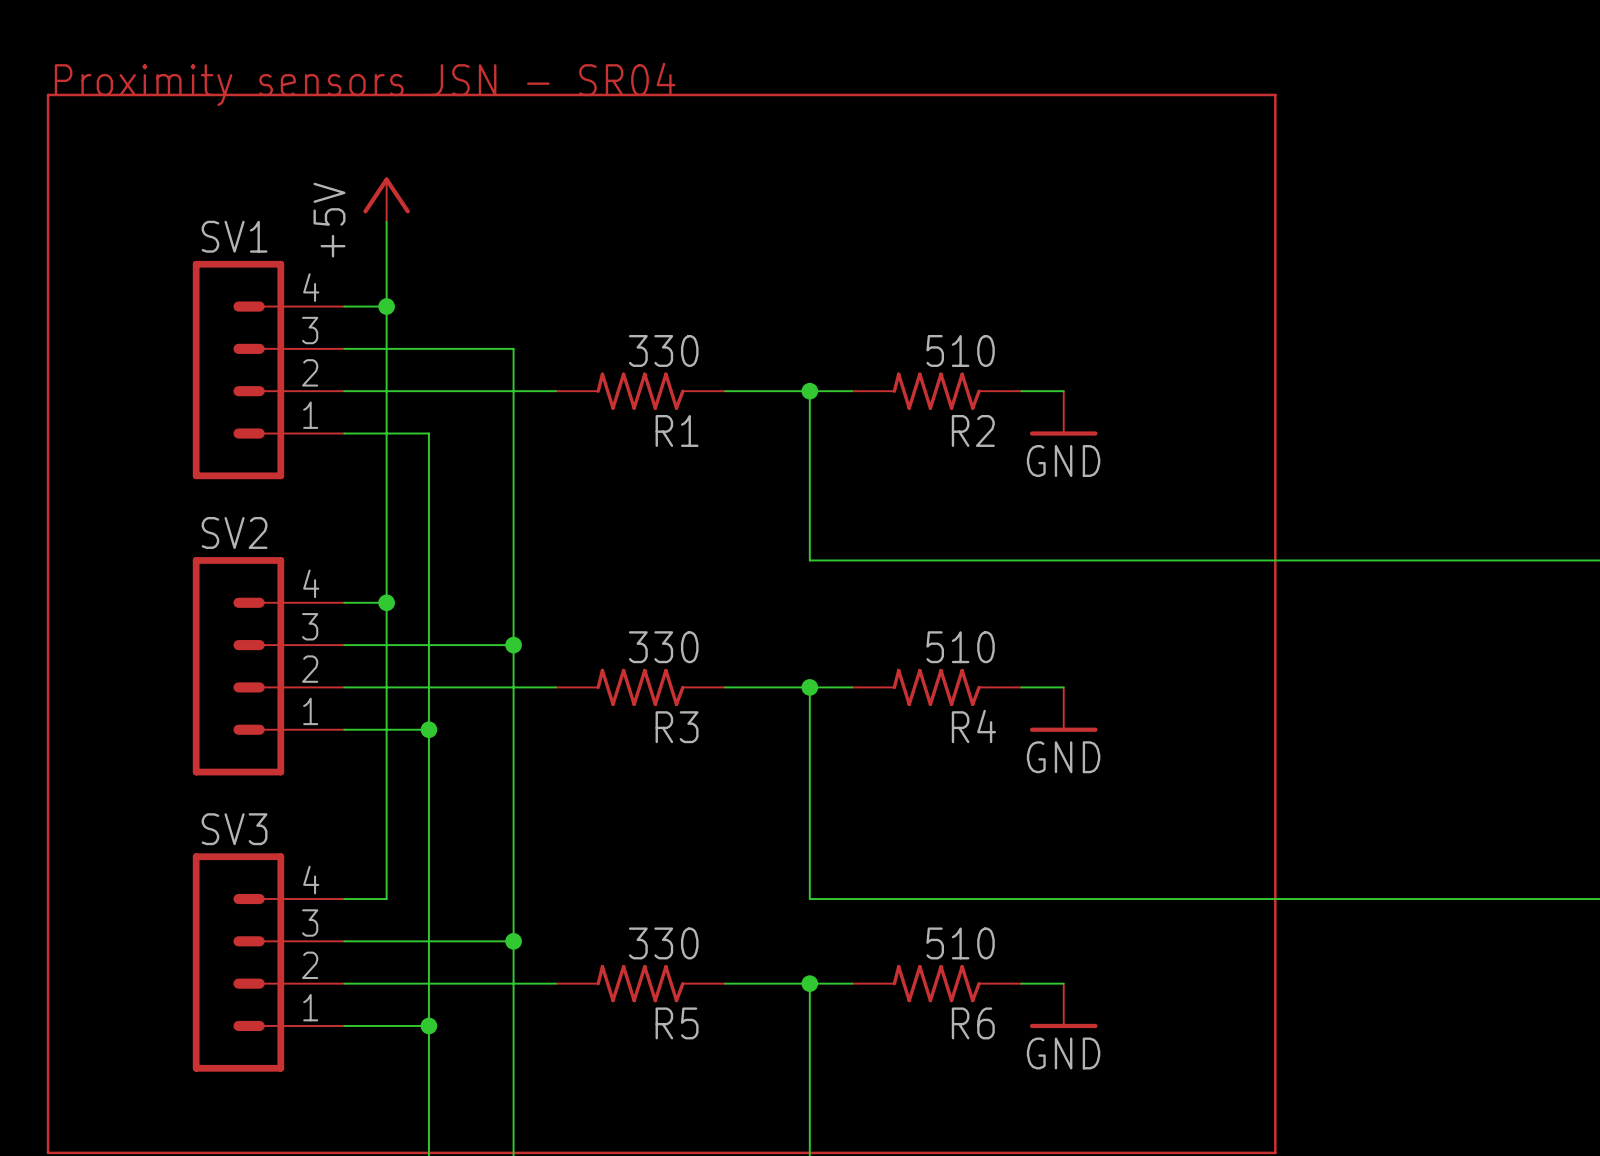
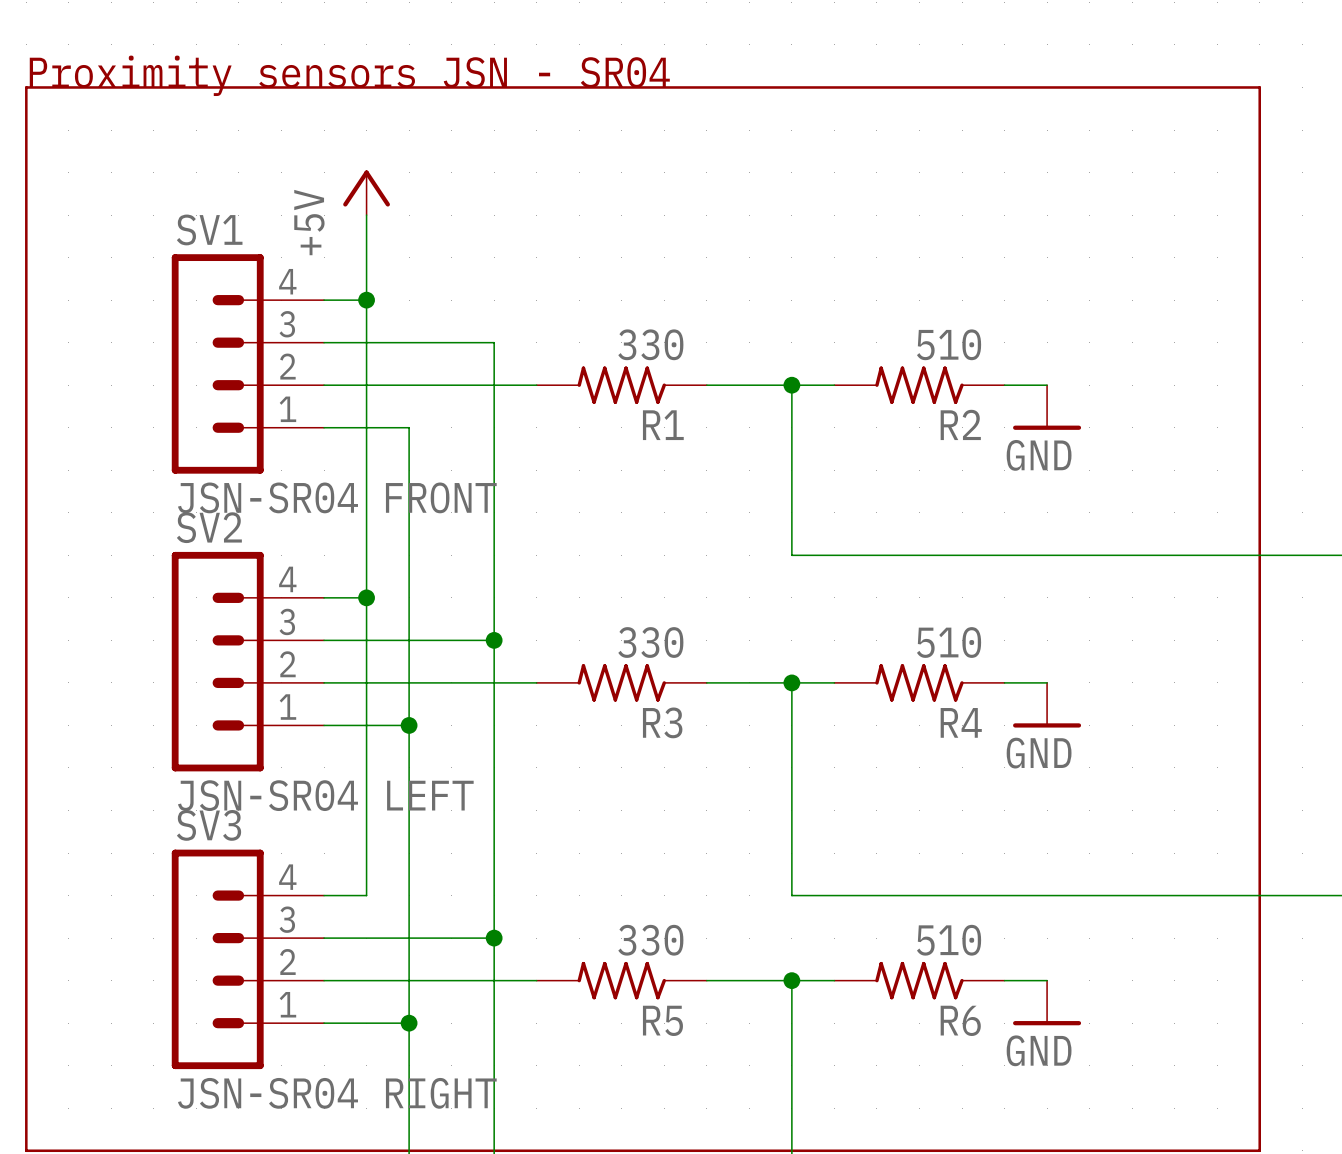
SV1 value: none -> JSN-SR04 FRONT (337, 497)
SV2 value: none -> JSN-SR04 LEFT (325, 795)
SV3 value: none -> JSN-SR04 RIGHT (337, 1093)

